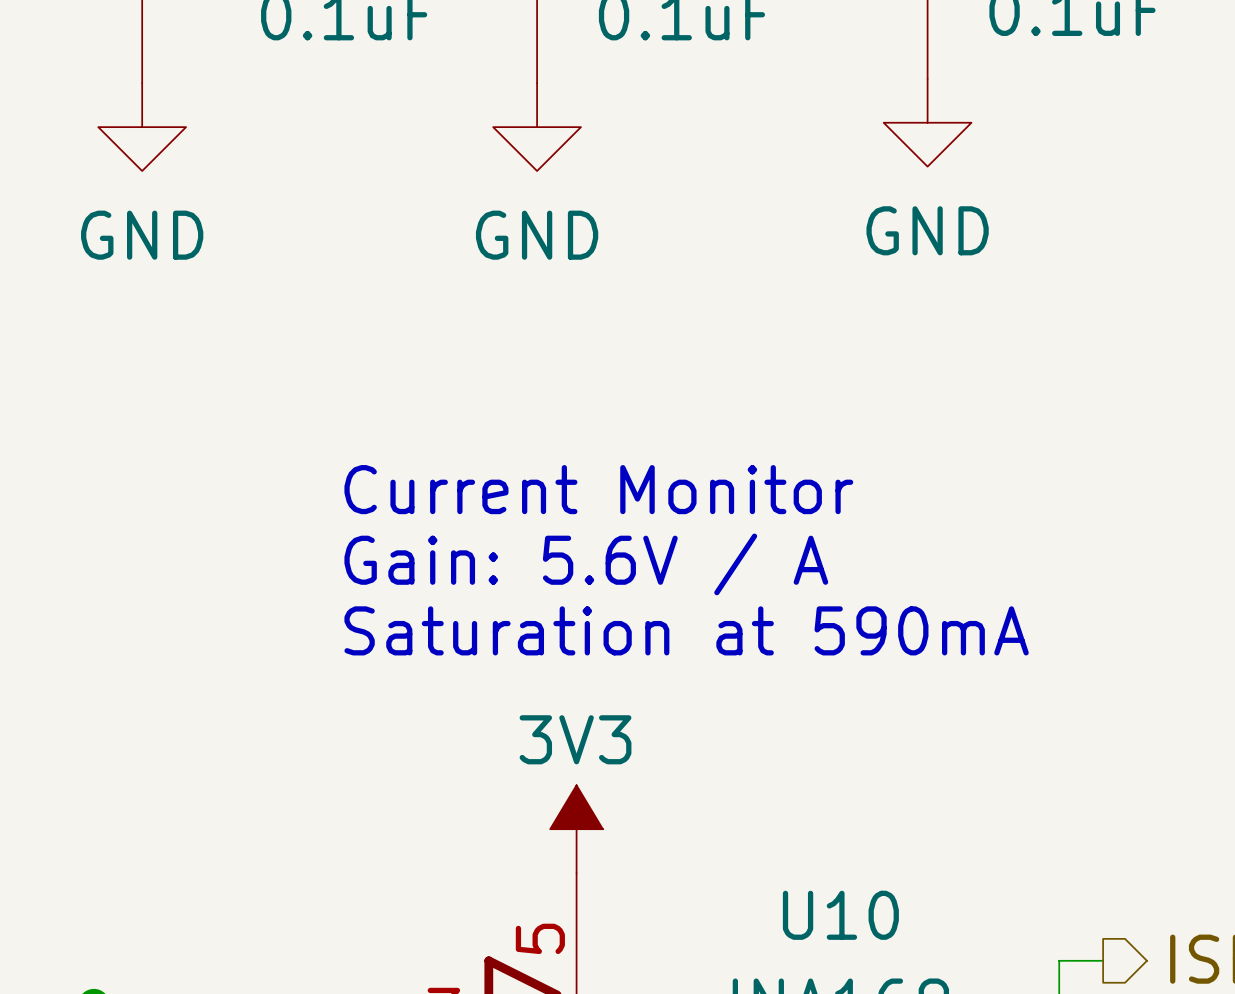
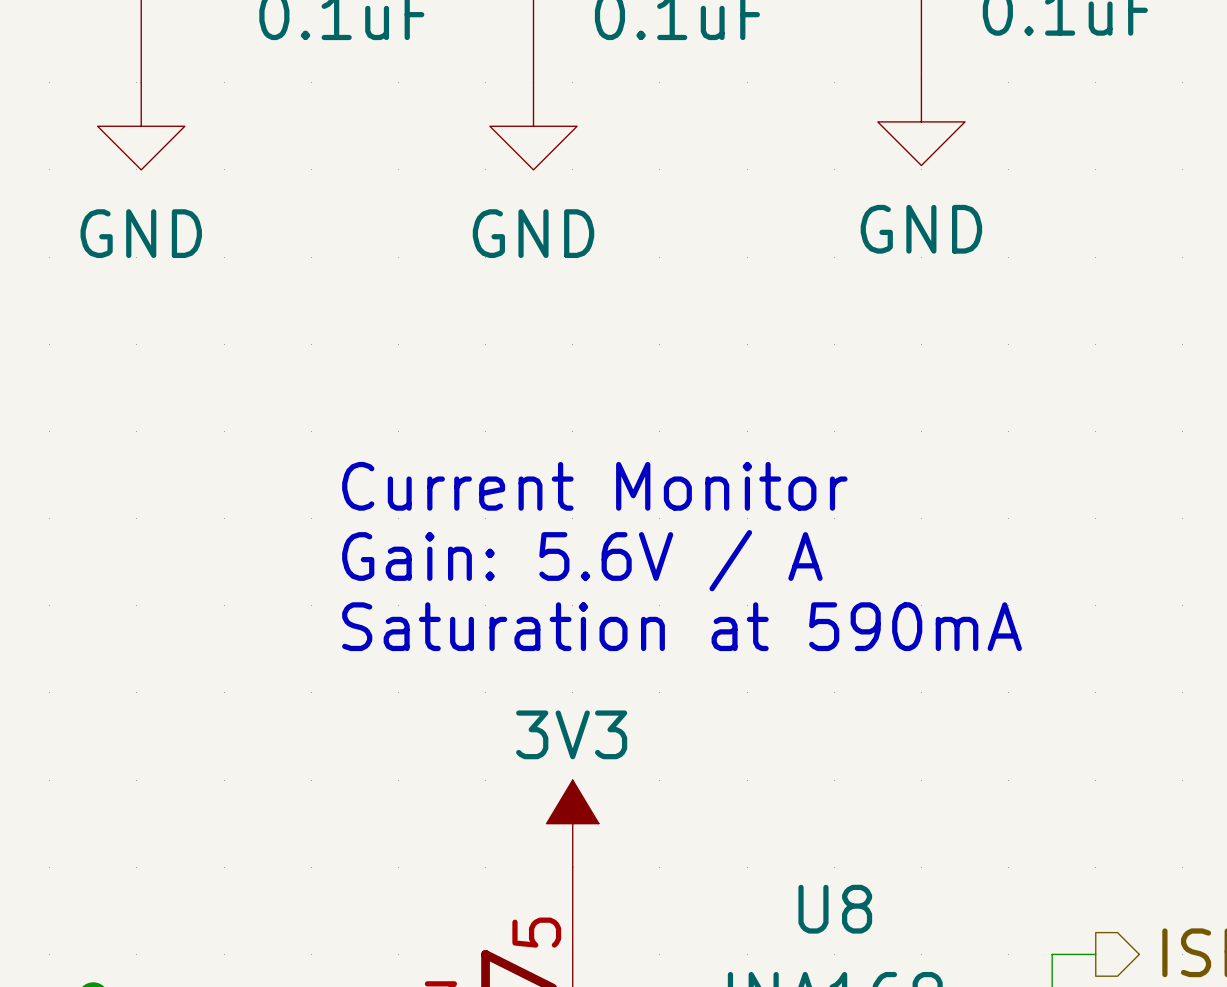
U10 name: U10 (840, 915) -> U8 (835, 909)

